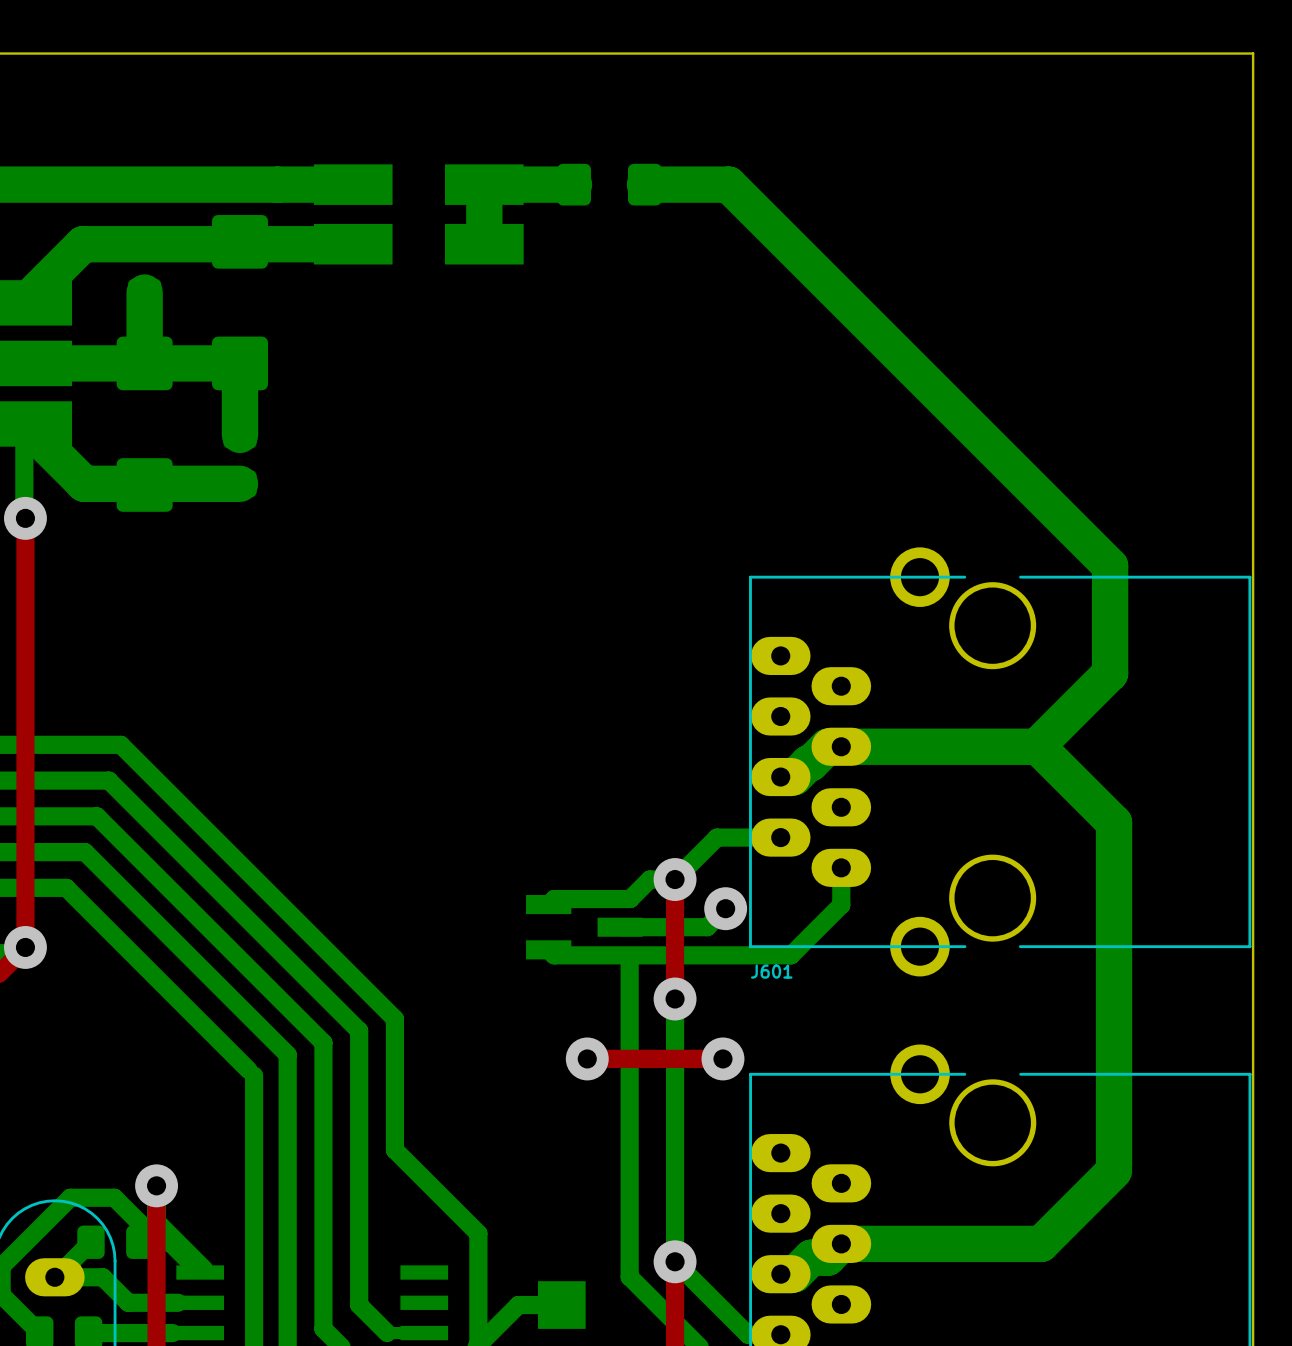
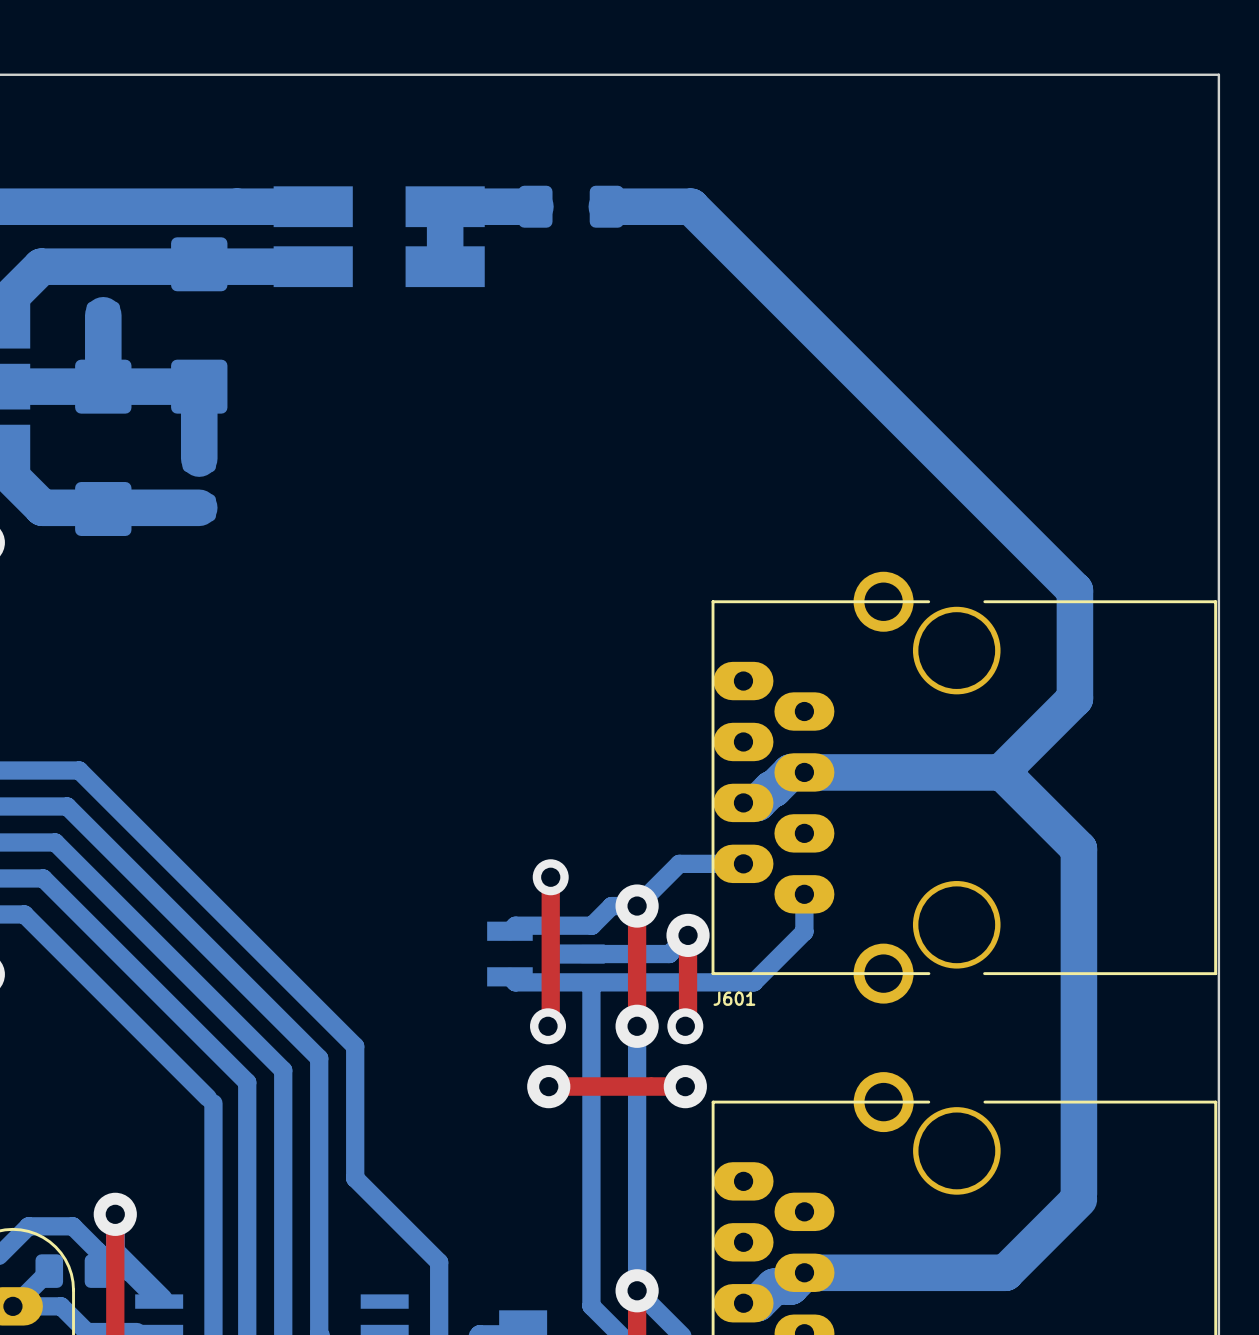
top track: none -> (550, 877) (550, 1023) (548, 1026)
via: none -> (550, 877)
top track: none -> (688, 935) (688, 1023) (685, 1026)
via: none -> (685, 1026)
via: none -> (548, 1026)

